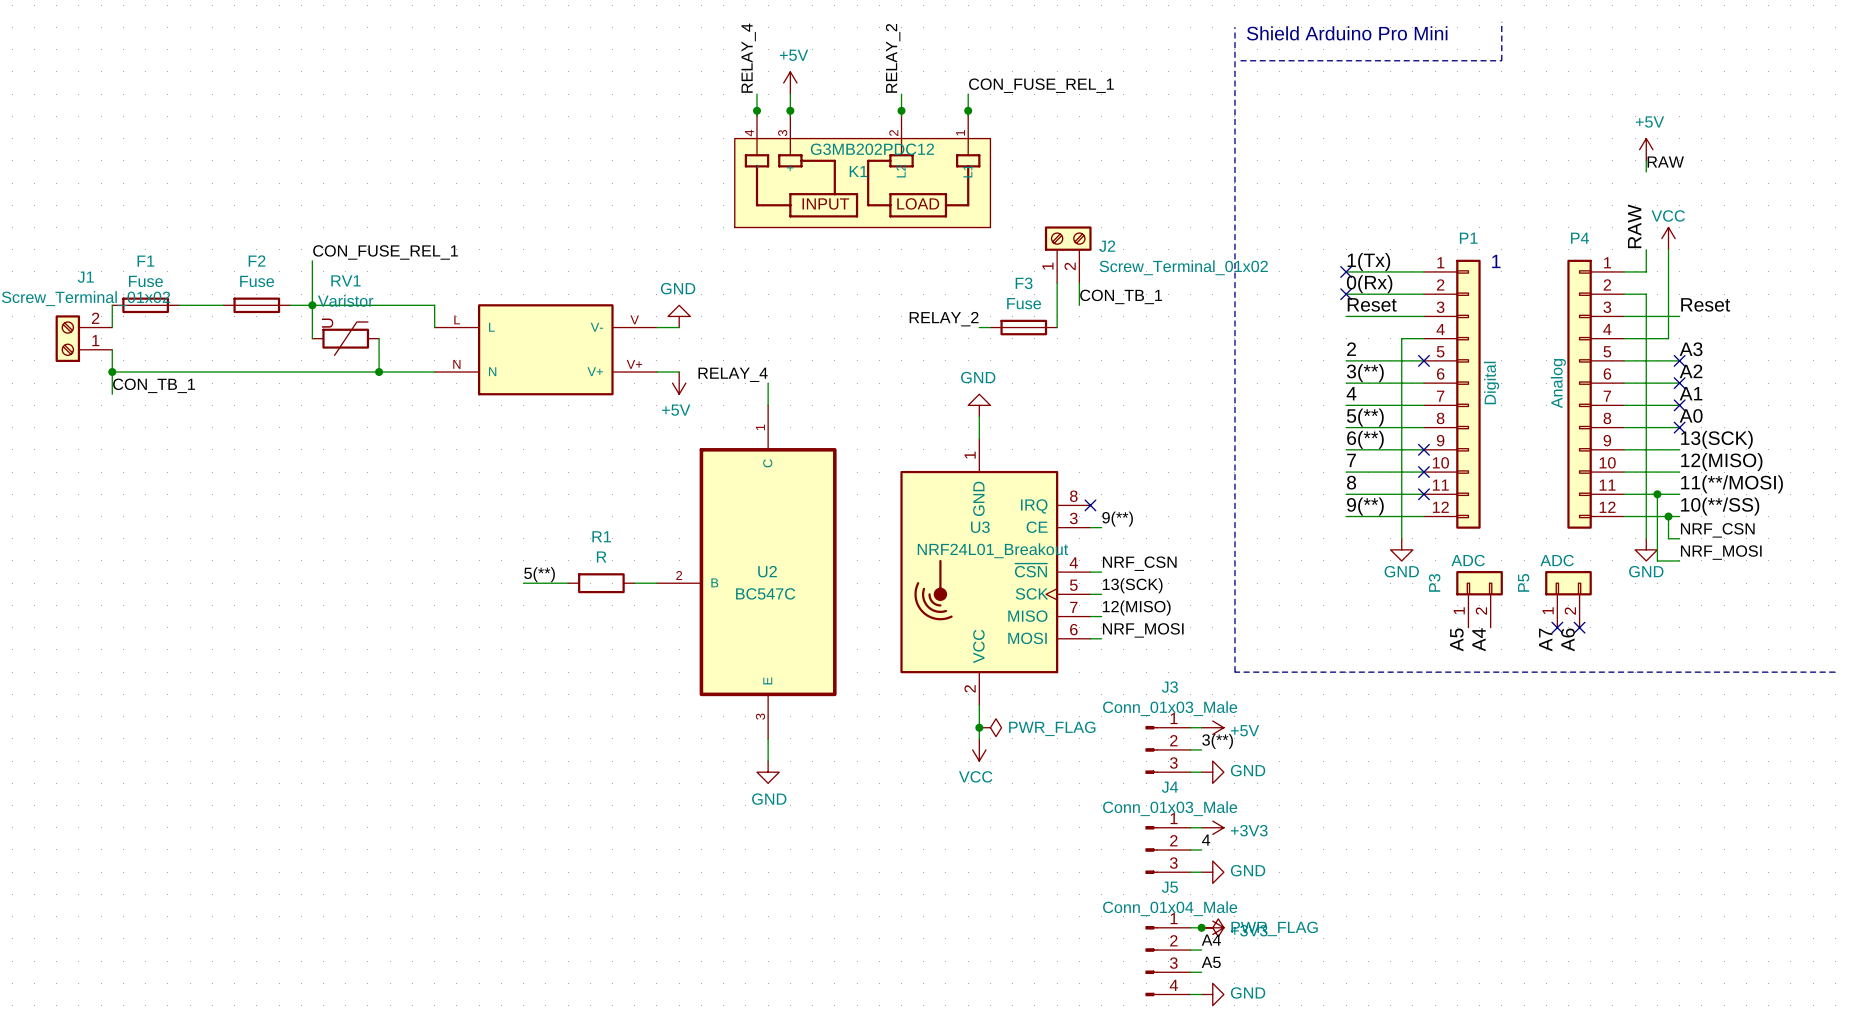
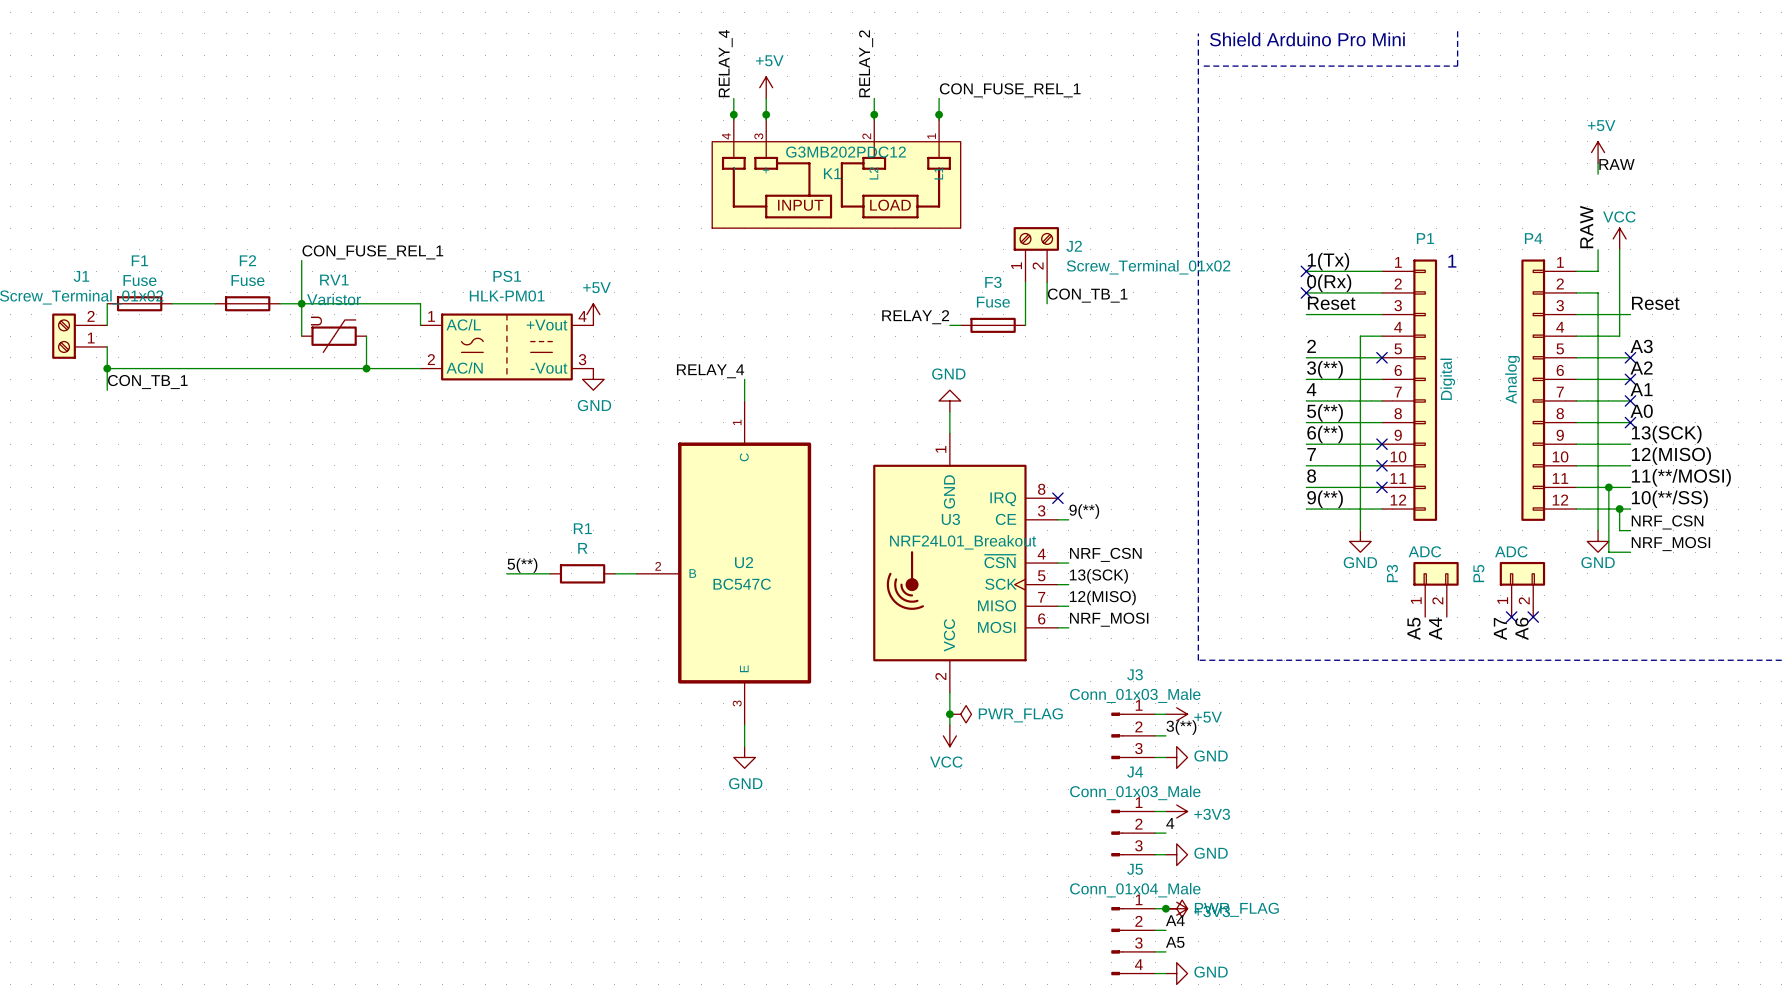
power symbol rotation: 0° (679, 316) -> 180° (593, 379)
power symbol position: GND (679, 316) -> GND (593, 379)
wire: (656, 327) (679, 327) -> none
PS1: none -> HLK-PM01 (506, 346)
part: (545, 349) -> none
wire: (656, 372) (679, 372) -> none
power symbol rotation: 0° (679, 383) -> 180° (593, 314)
power symbol position: +5V (679, 383) -> +5V (593, 314)

